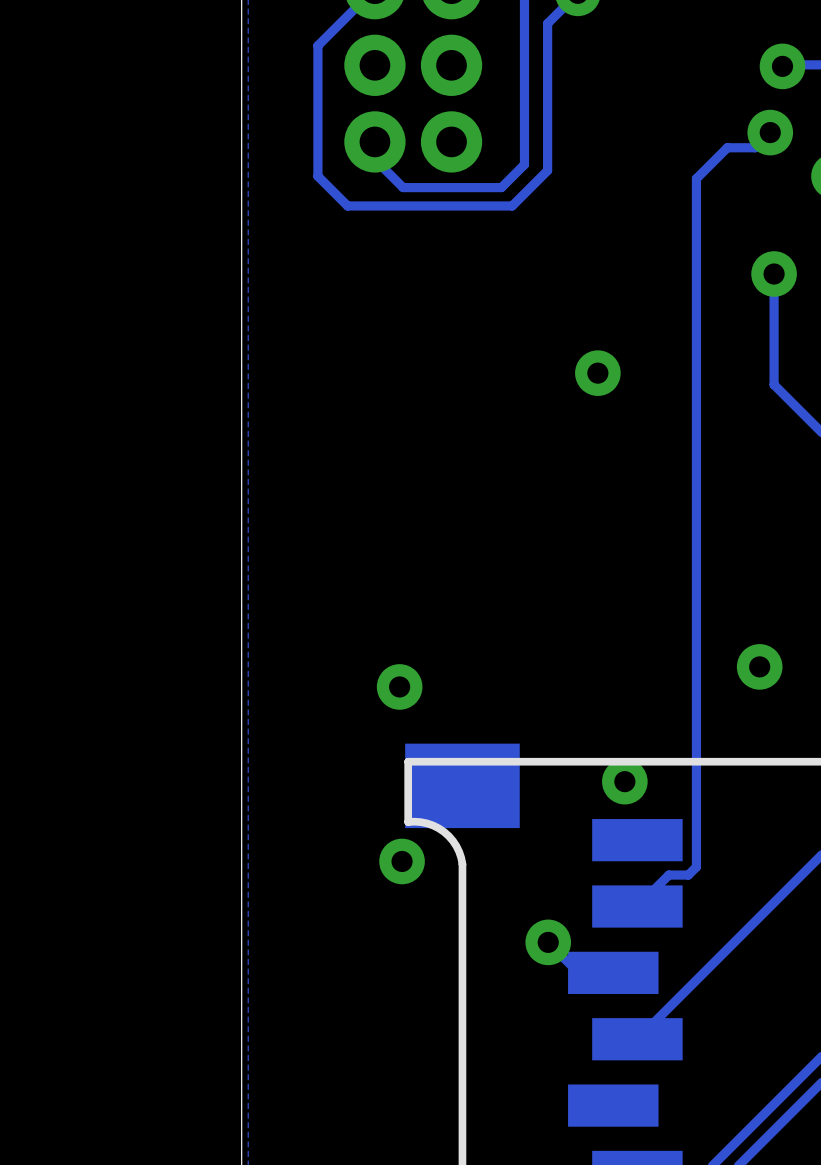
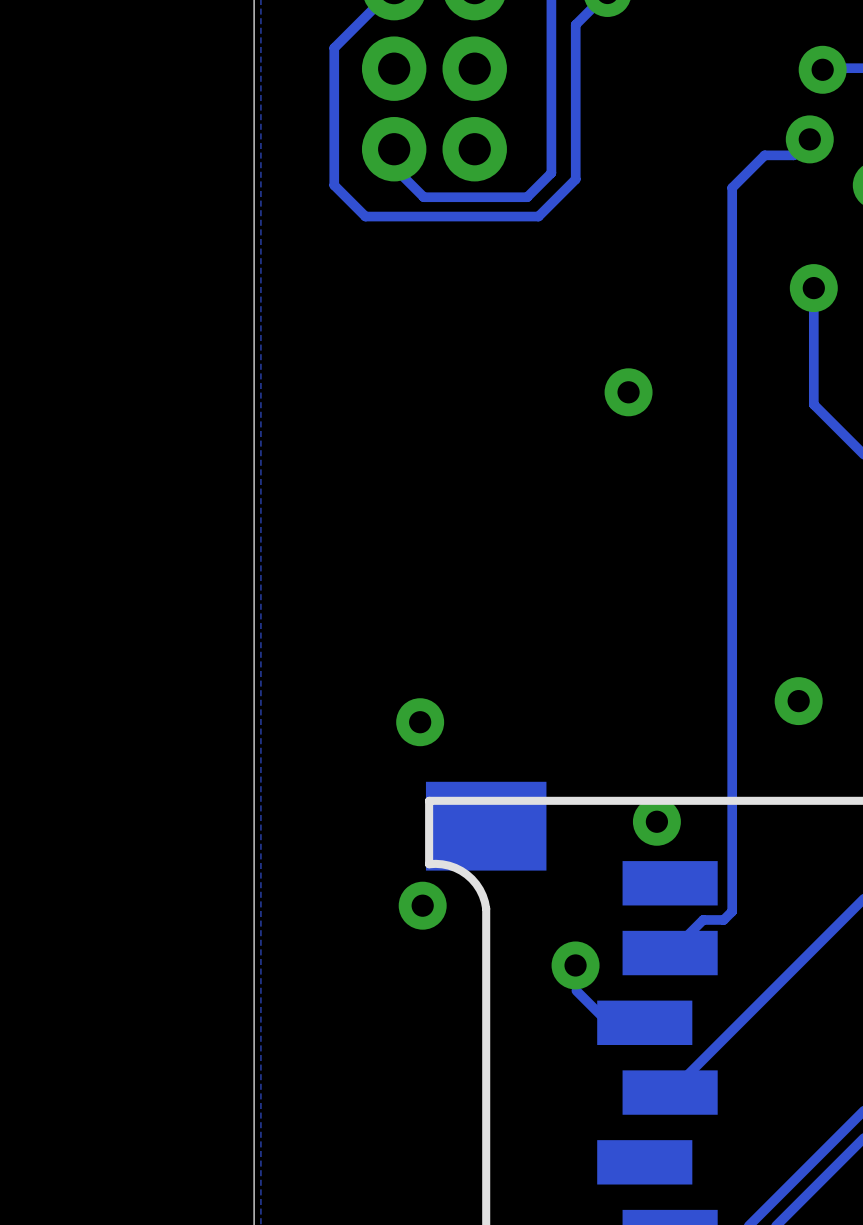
via position: (548, 942) -> (575, 965)

